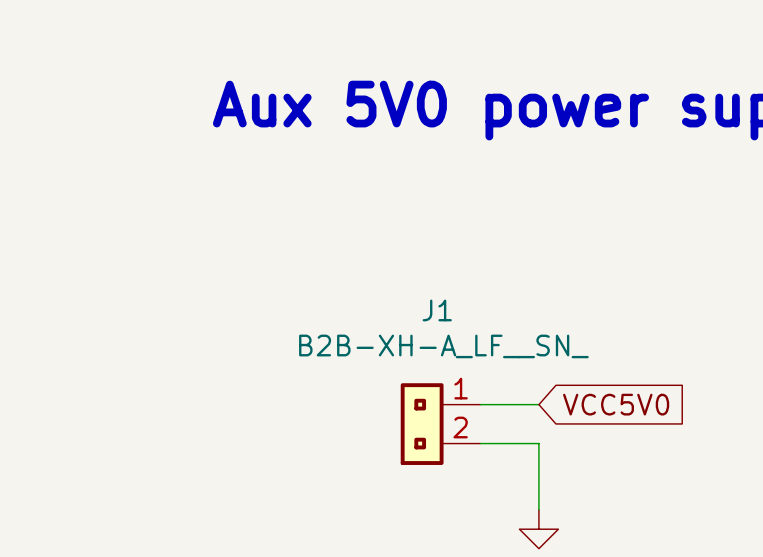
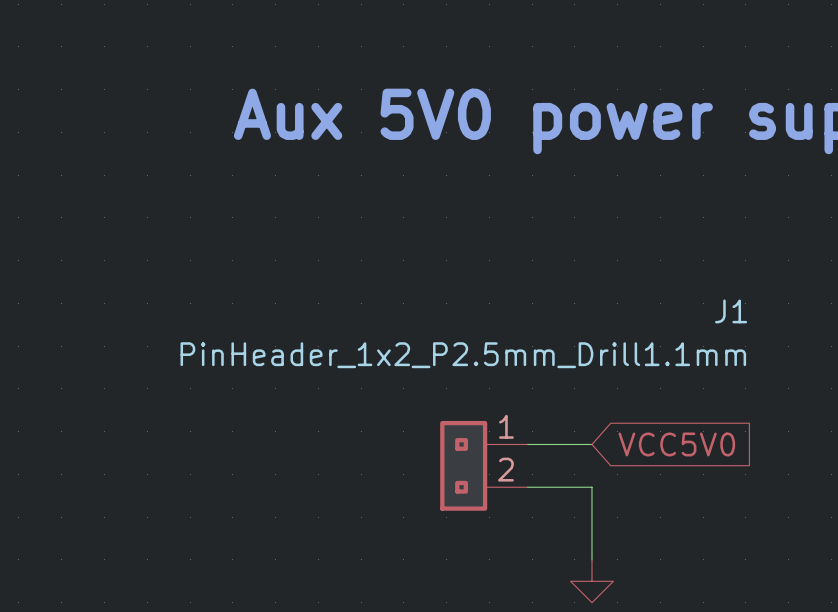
J1 name position: J1 (437, 310) -> J1 (731, 311)
J1 value: B2B-XH-A_LF__SN_ (443, 346) -> PinHeader_1x2_P2.5mm_Drill1.1mm (463, 355)

